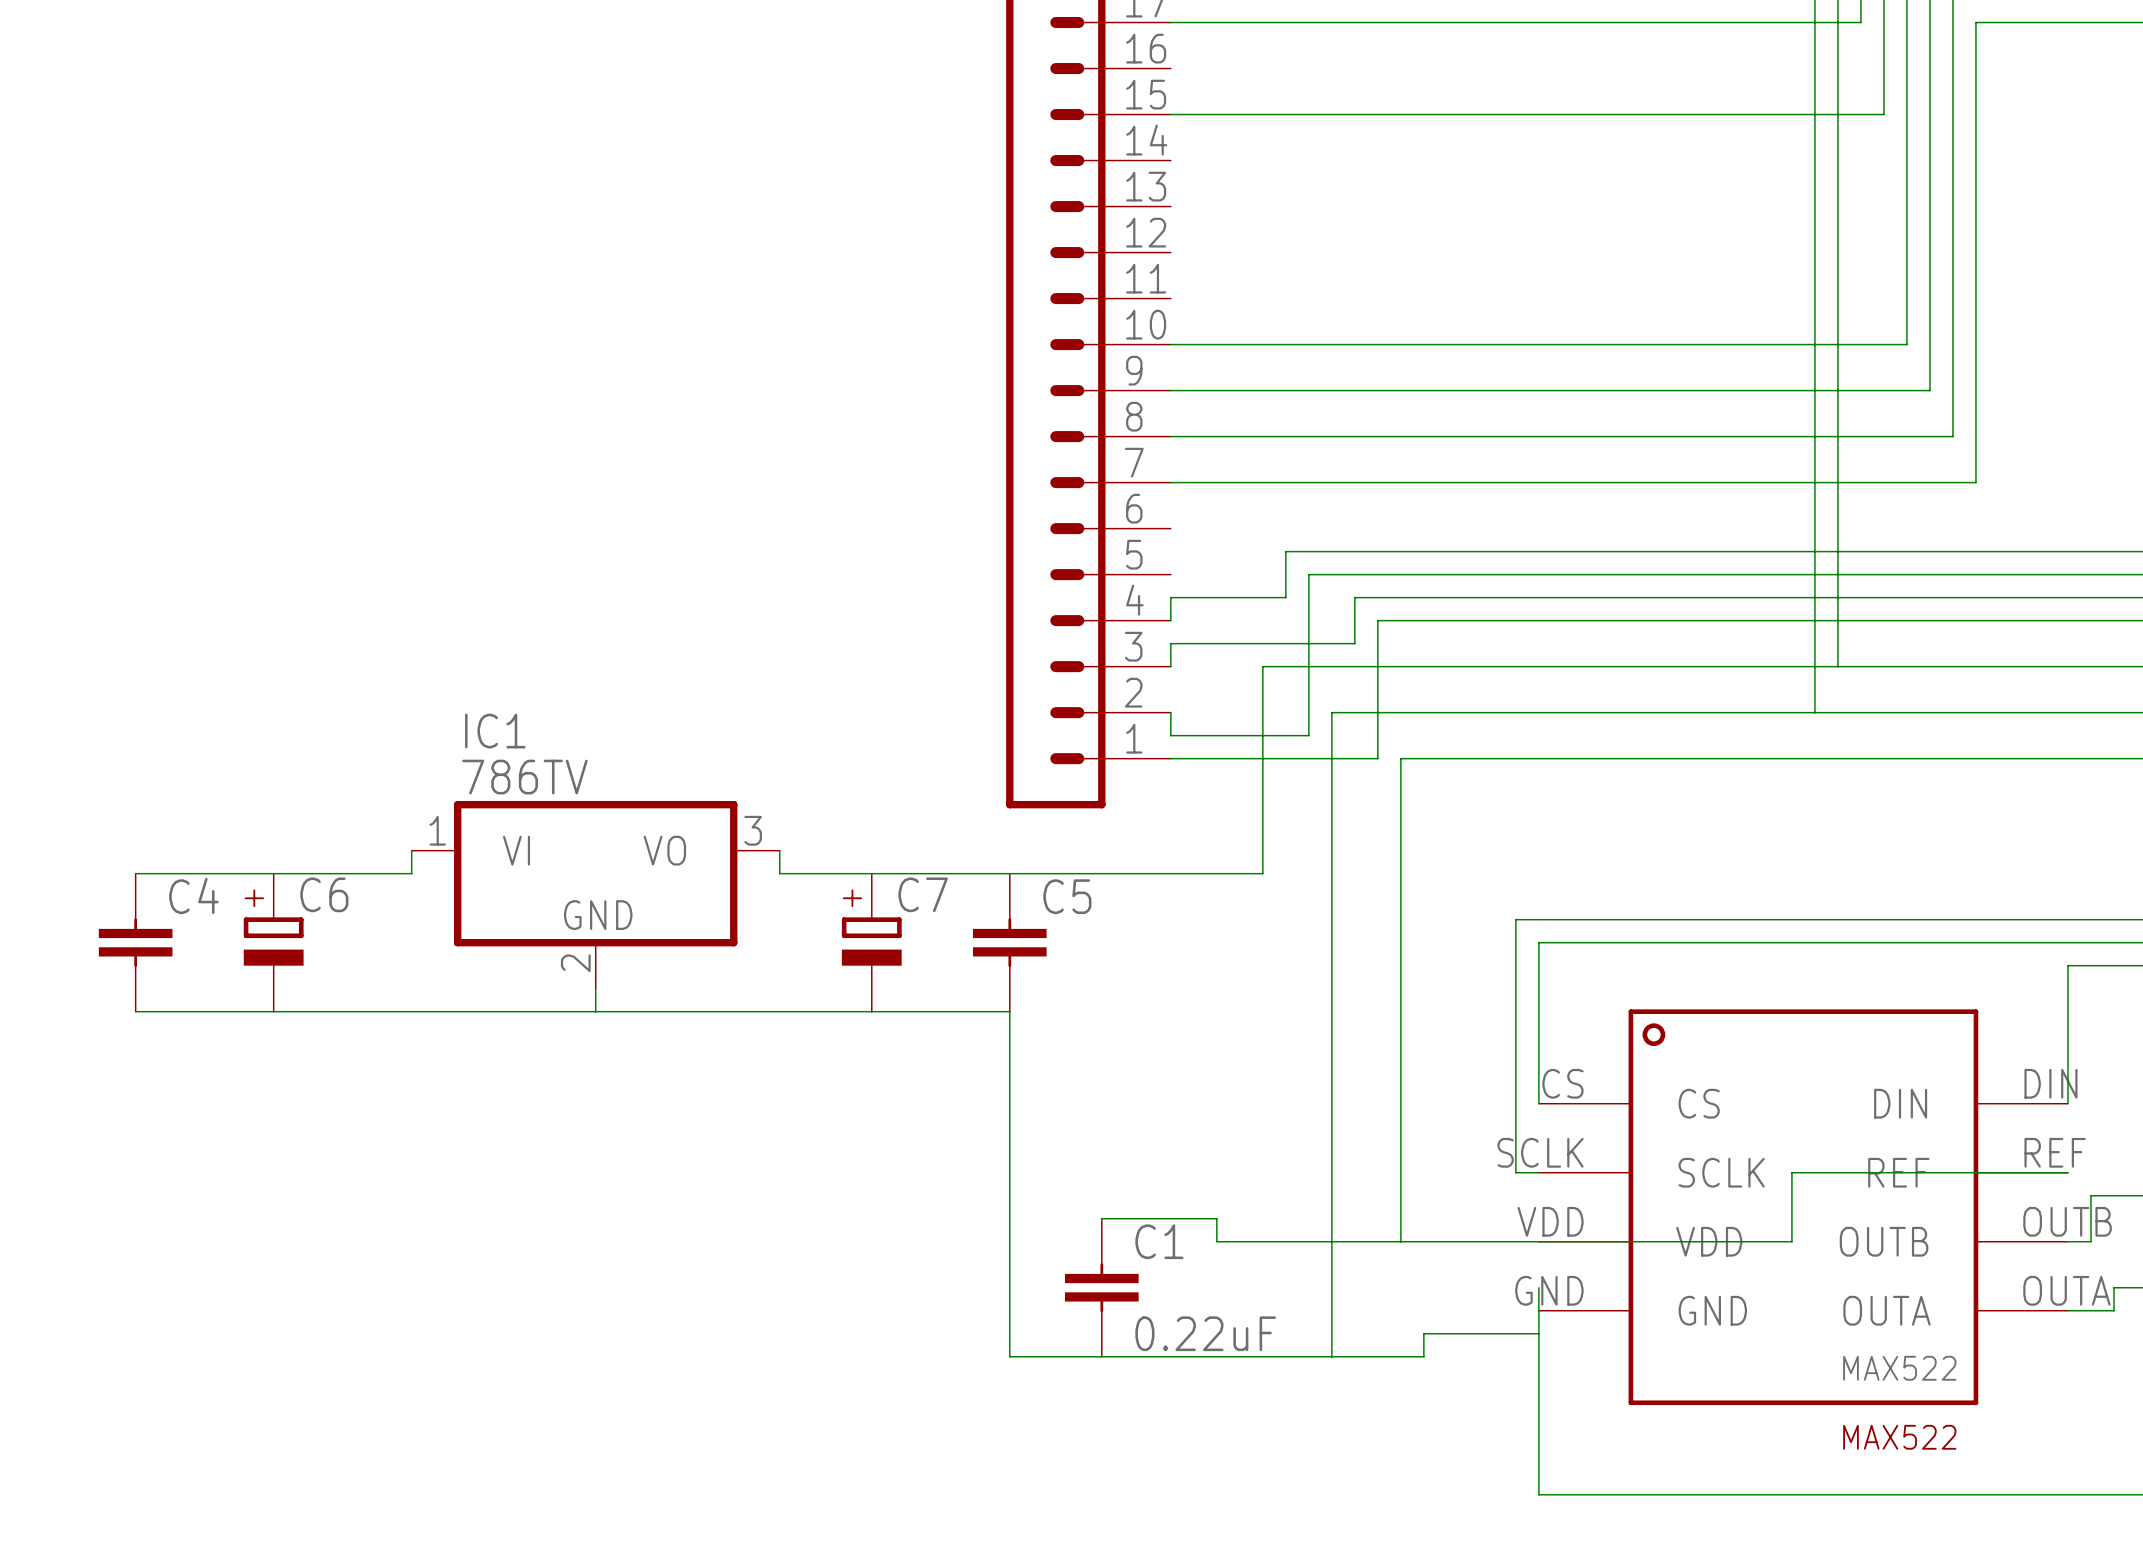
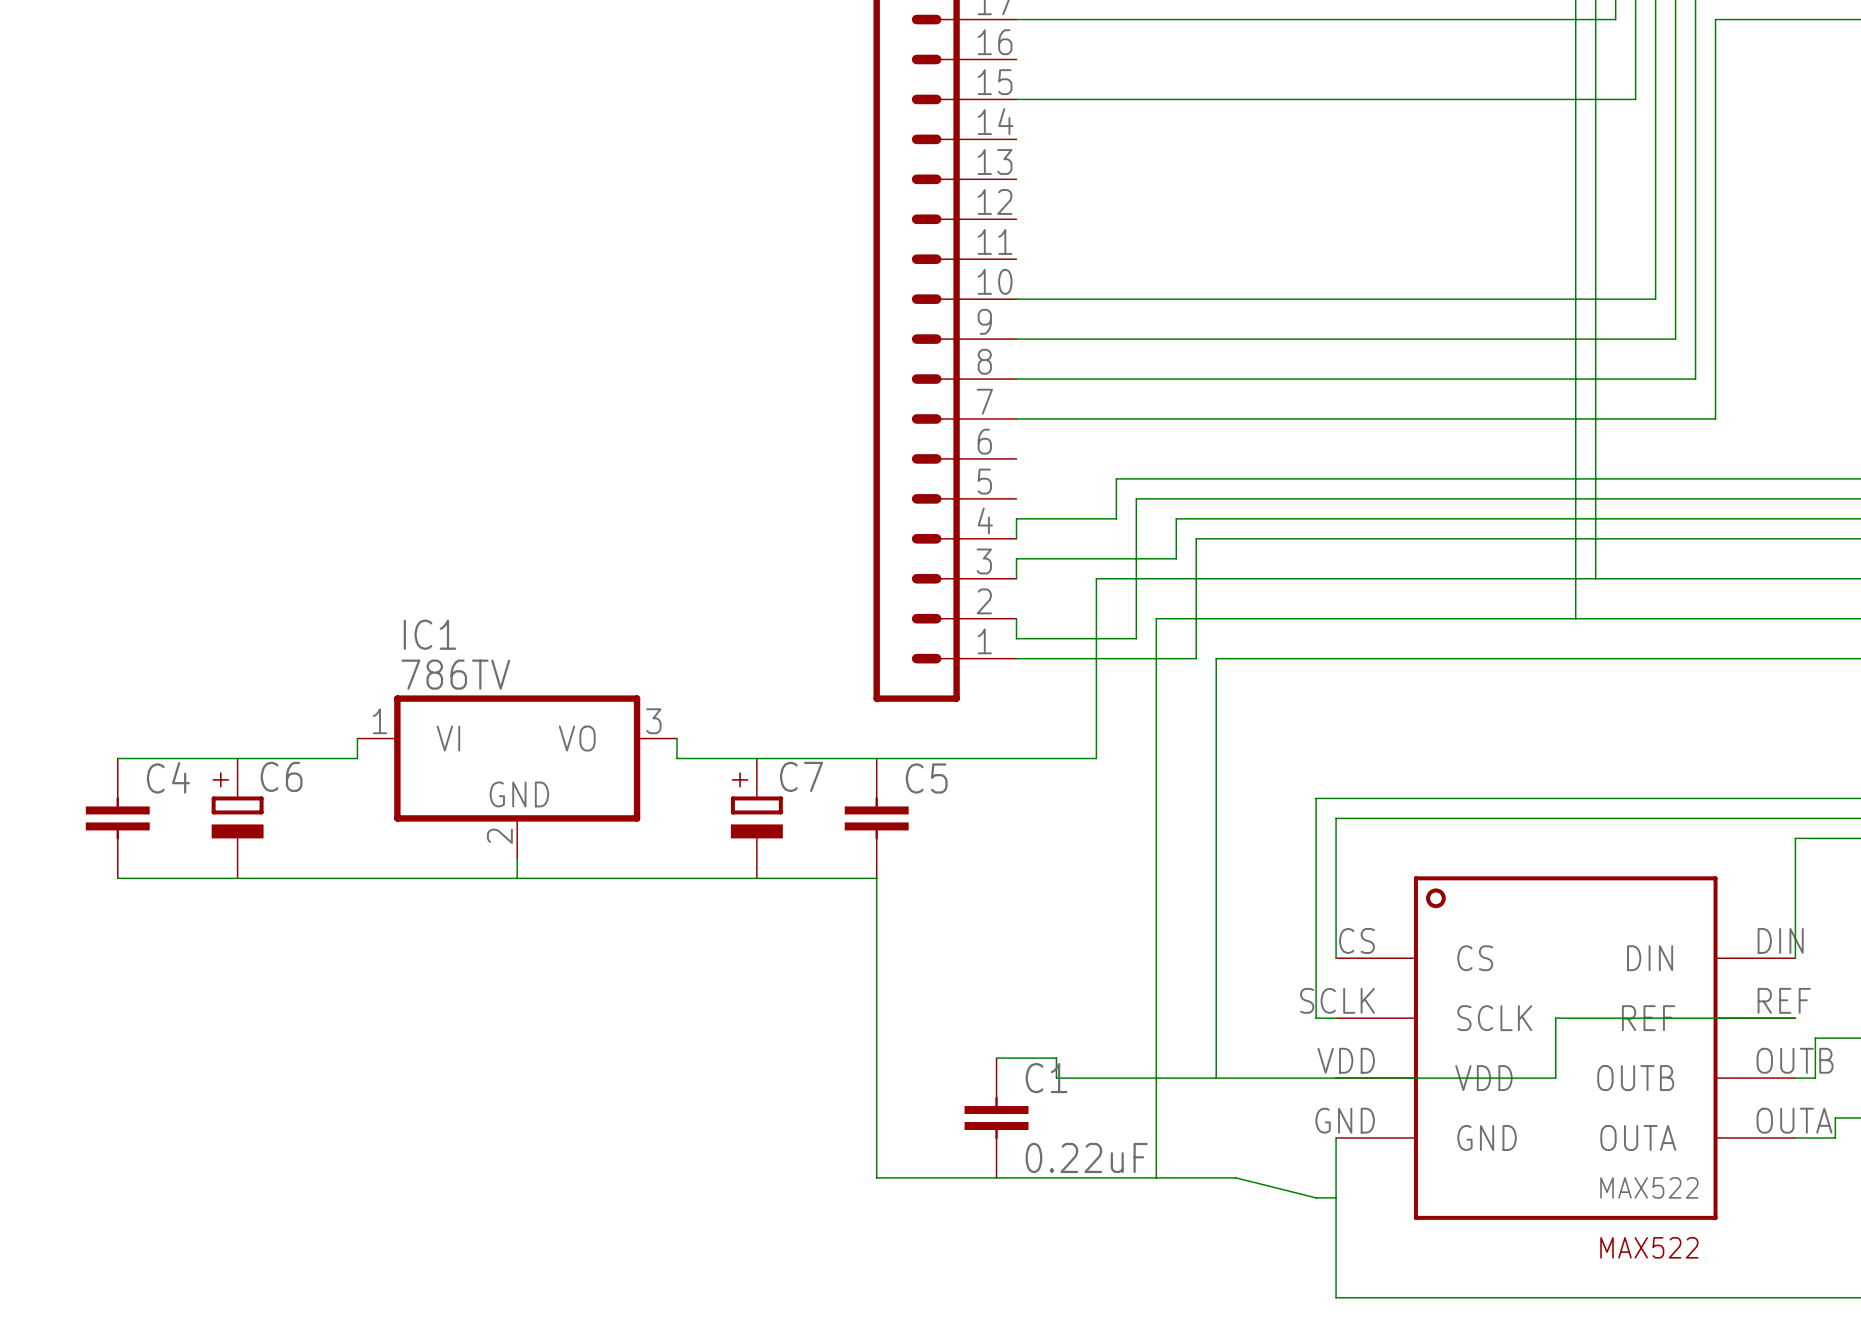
wire: (1101, 1218) (1147, 1218) -> none
C1 position: (1101, 1287) -> (996, 1118)
wire: (1538, 1287) (1538, 1310) -> none
wire: (1538, 1333) (1423, 1333) (1423, 1356) -> (1336, 1197) (1316, 1197) (1236, 1177)

